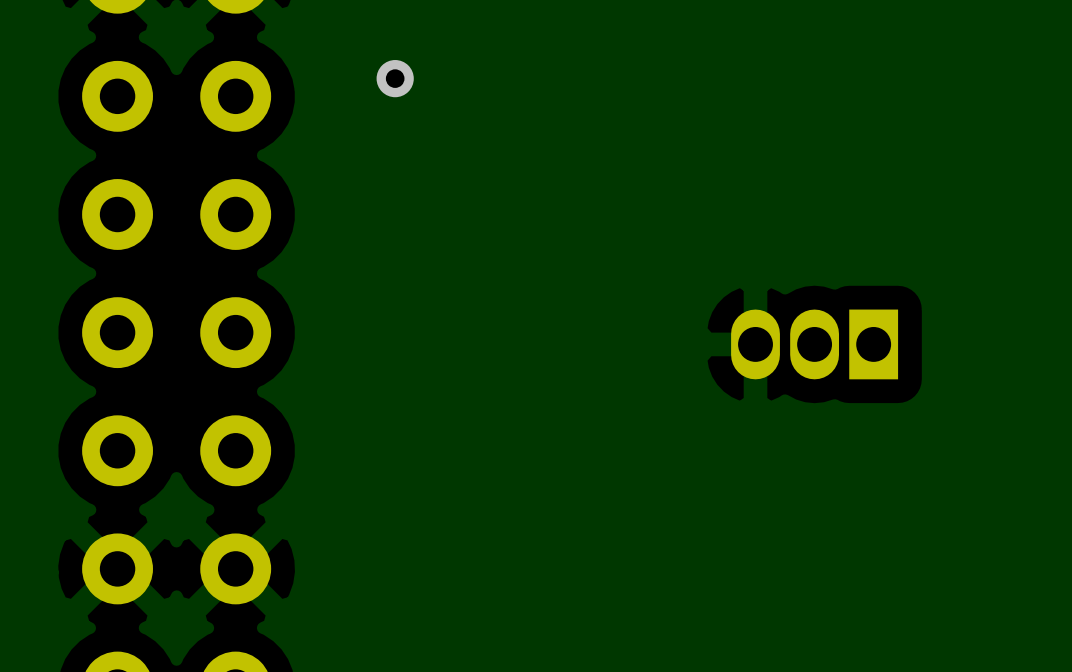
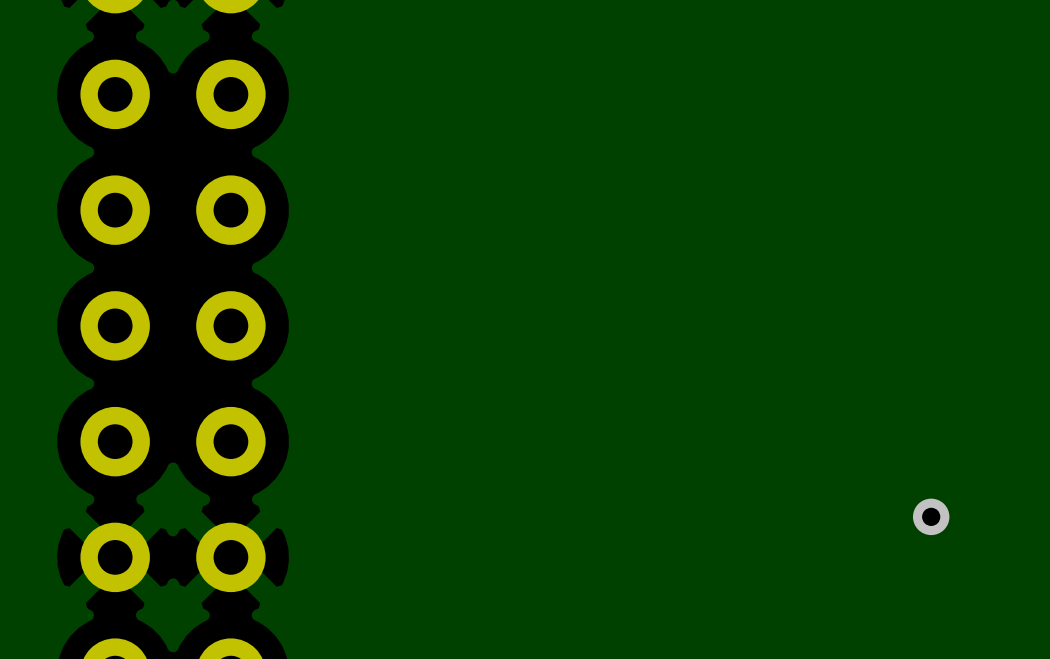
via: (395, 78) -> none
part: (814, 344) -> none
via: none -> (931, 516)

